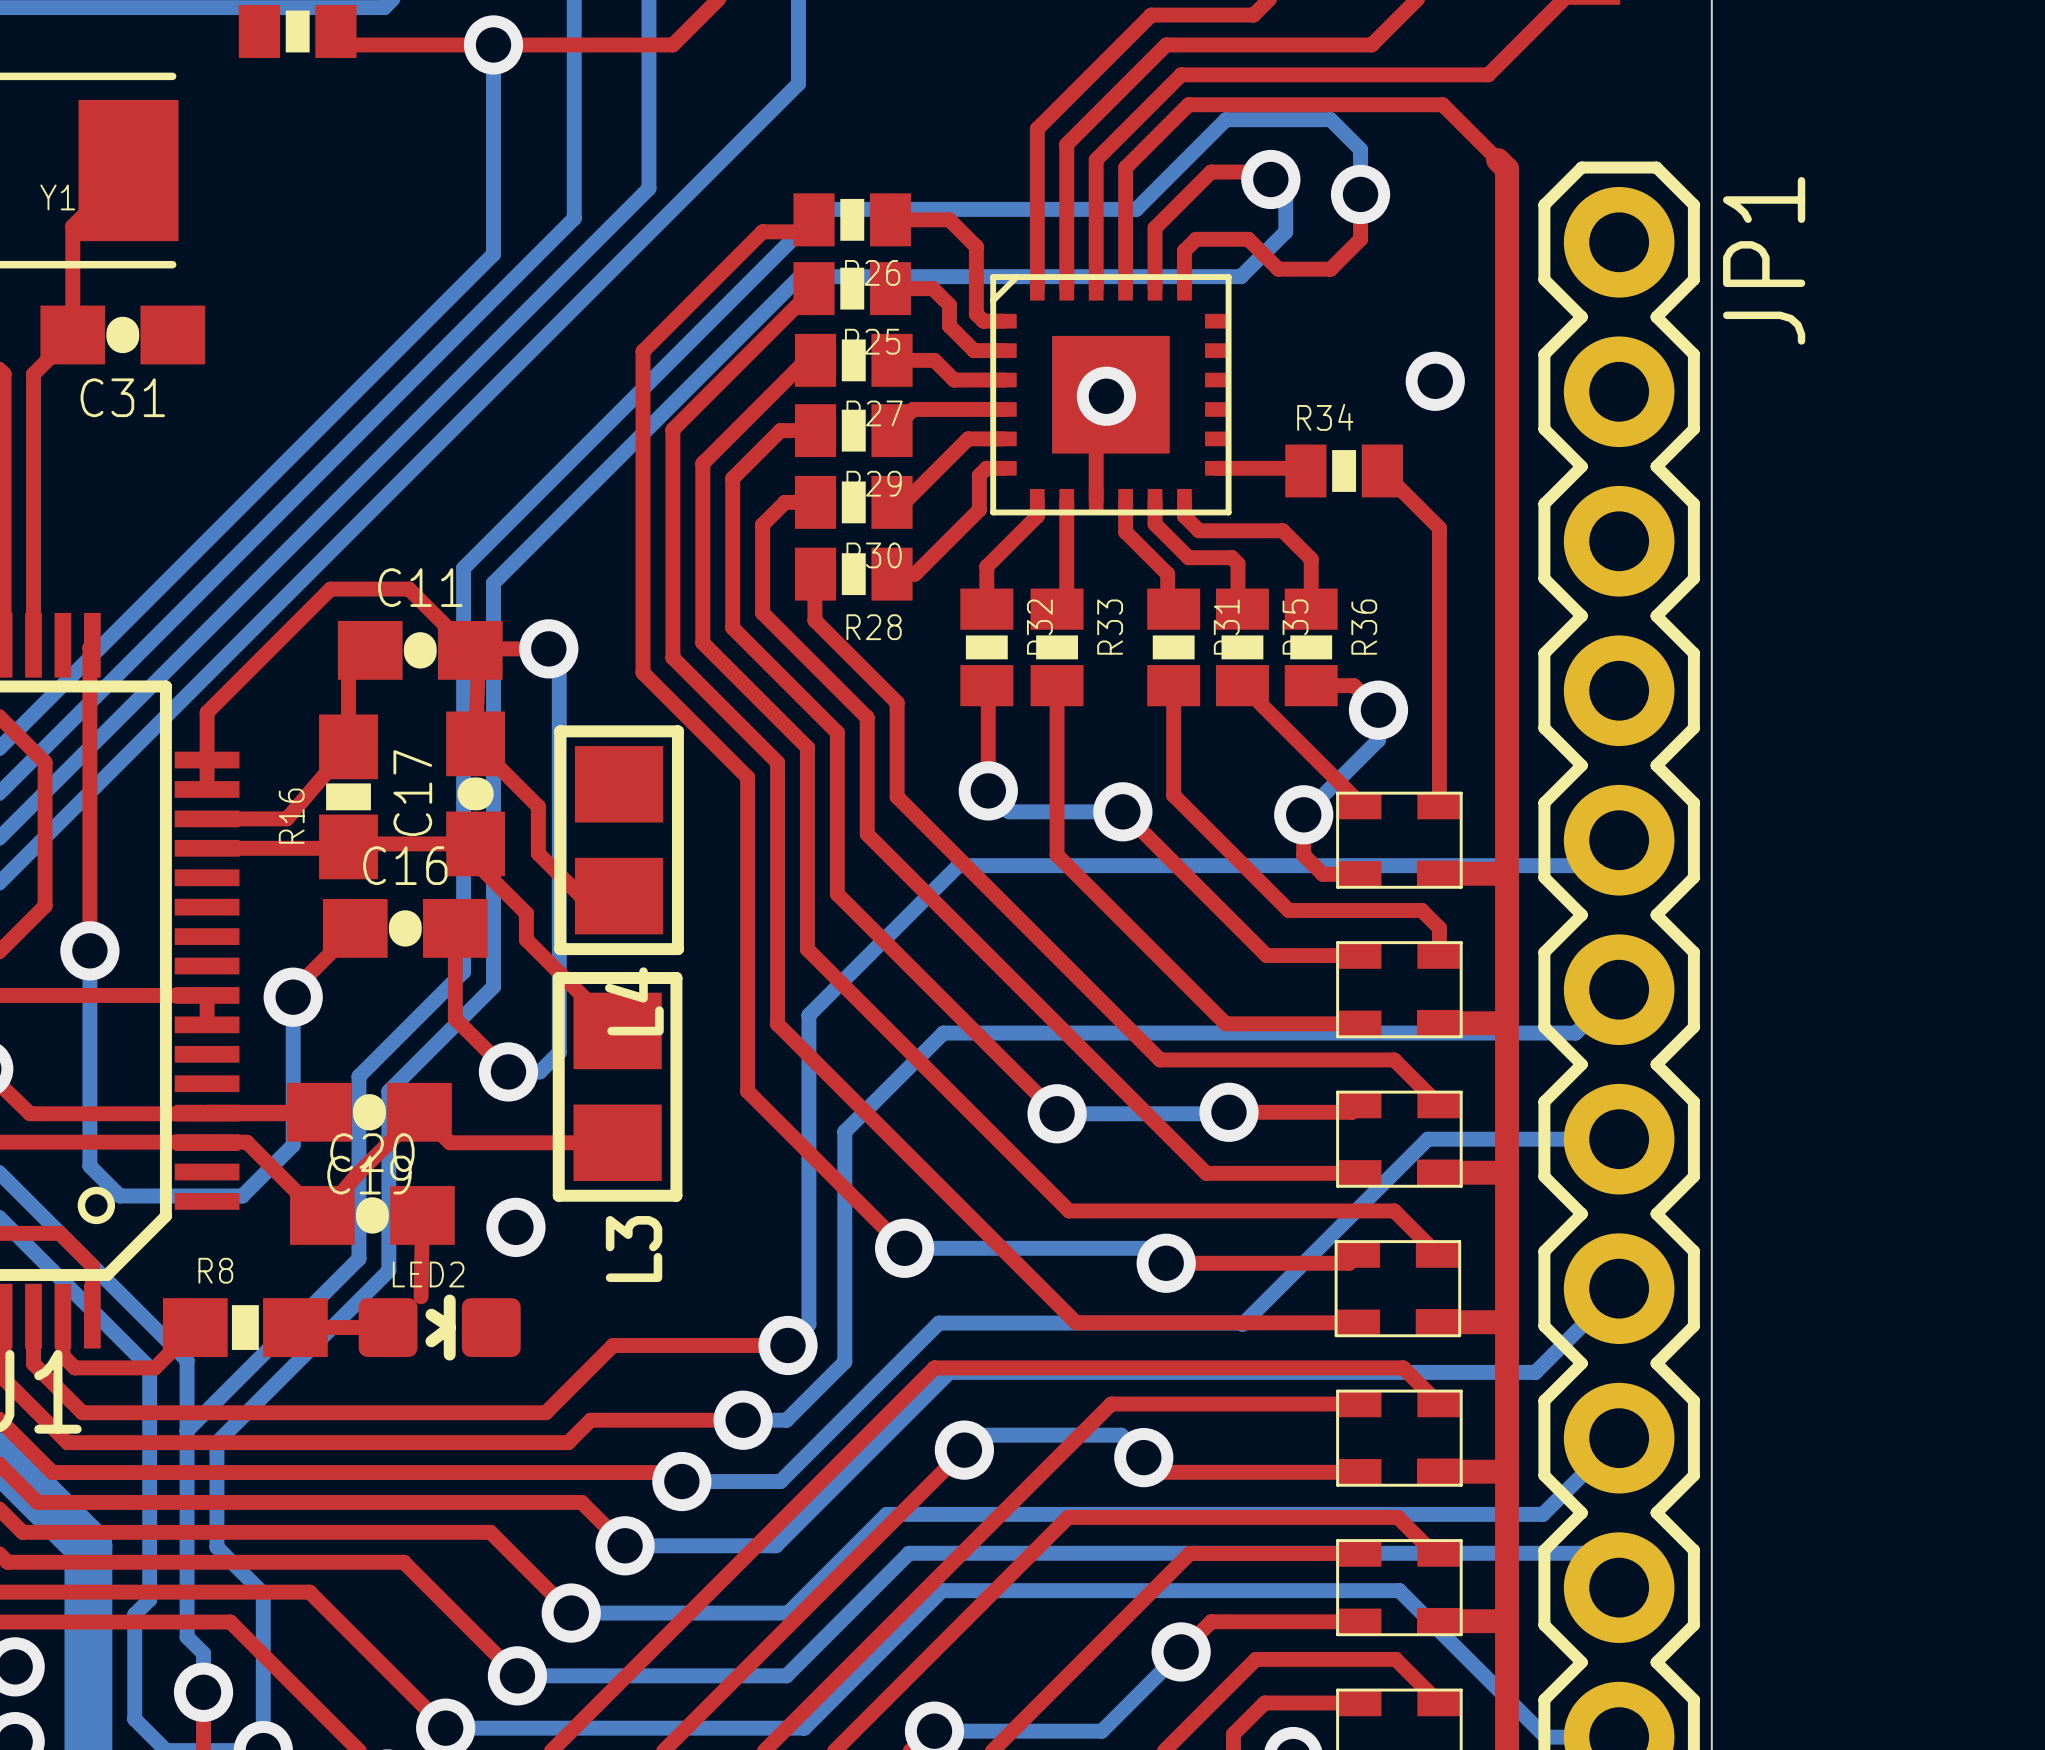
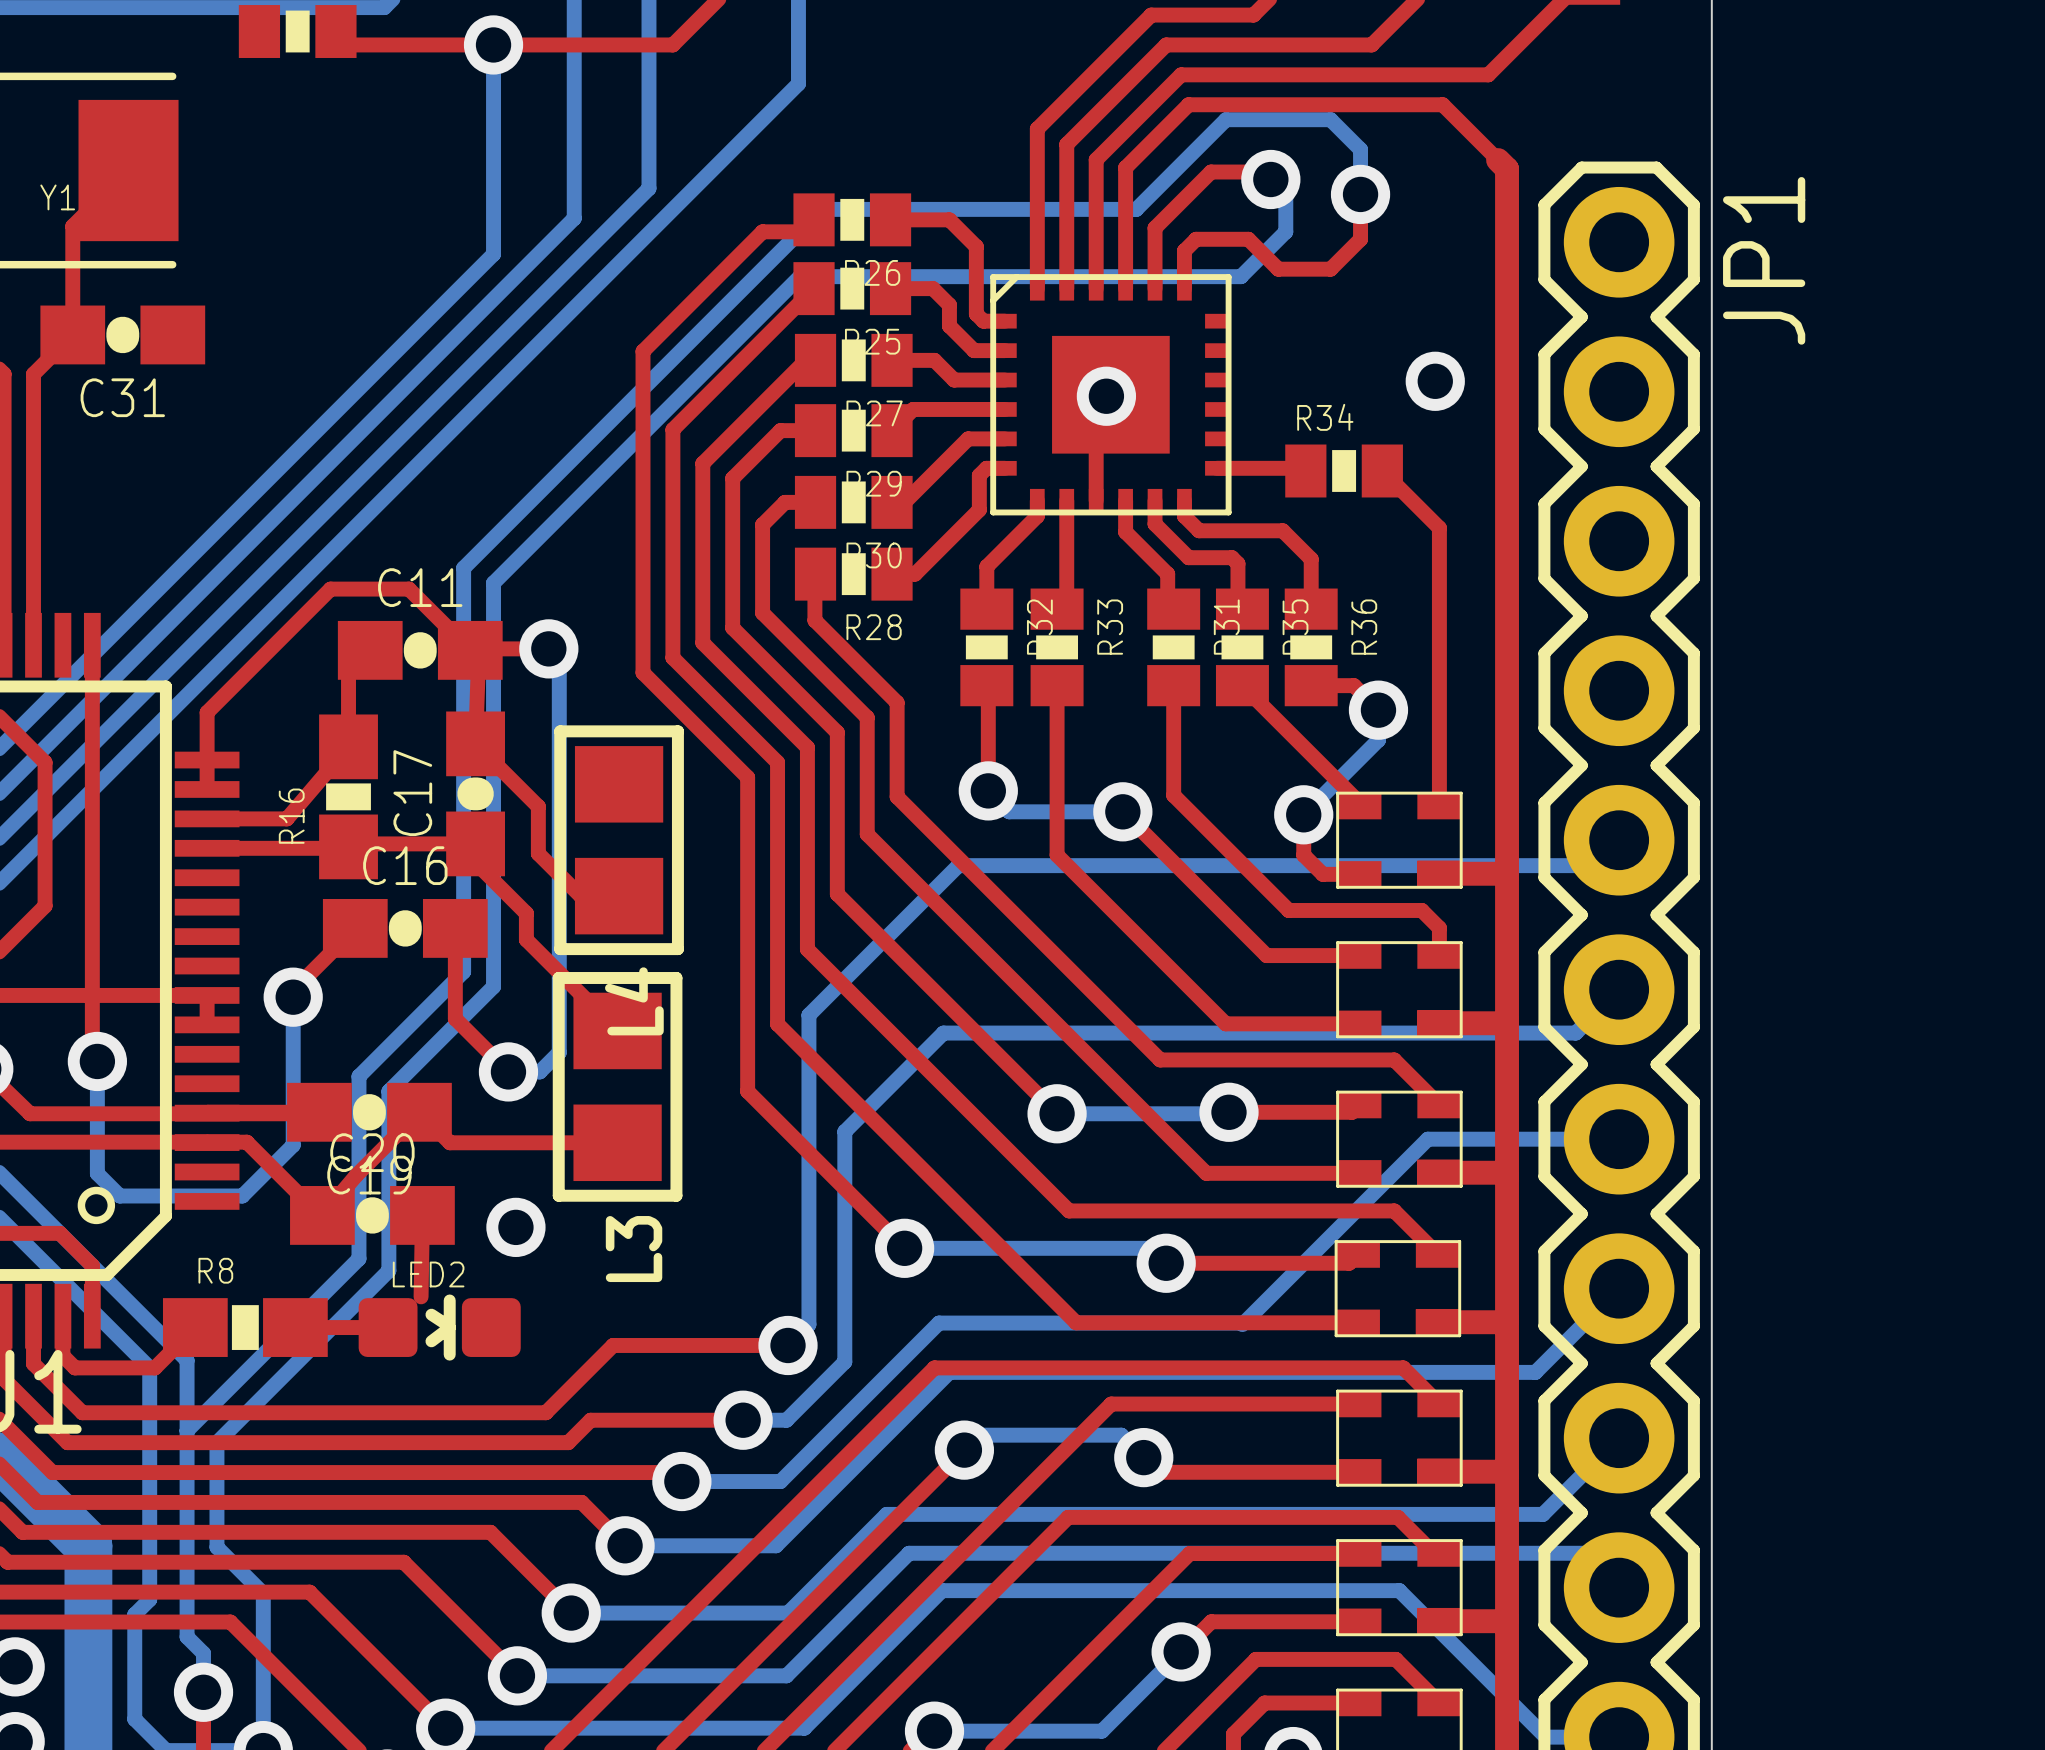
top track: (92, 645) (89, 647) (89, 950) -> (92, 645) (92, 1056) (97, 1061)
bottom track: (89, 950) (89, 1166) (97, 1173) -> (97, 1061) (97, 1173)
via position: (89, 950) -> (97, 1061)

